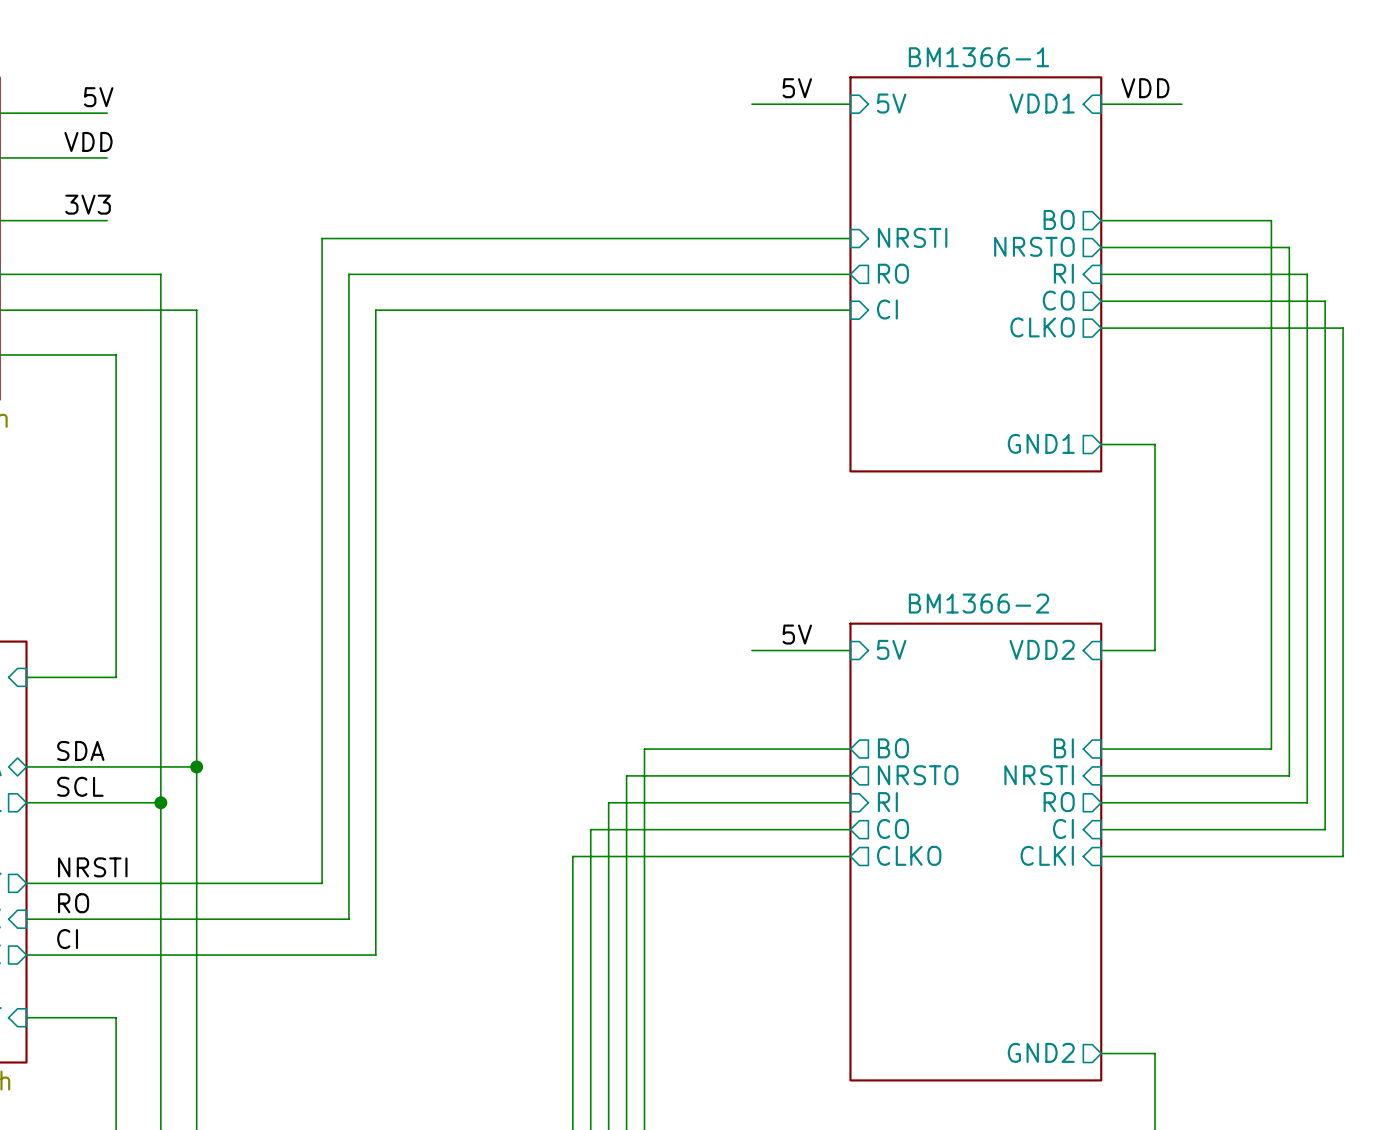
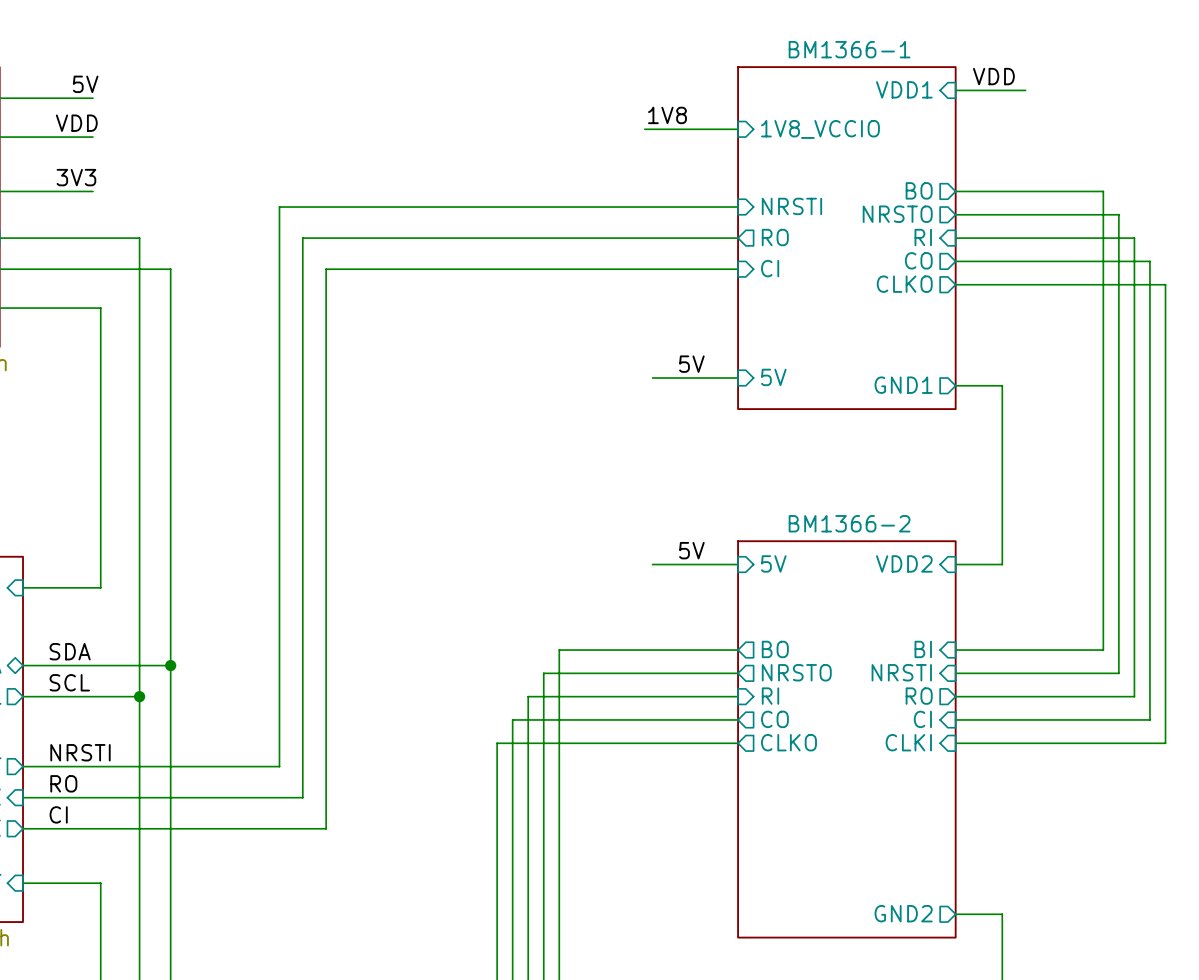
label position: 5V (797, 88) -> 5V (691, 364)
sheet pin position: 5V (891, 103) -> 5V (773, 377)
wire: (751, 104) (850, 104) -> (652, 378) (738, 378)
label: none -> 1V8 (667, 115)
wire: none -> (644, 129) (738, 129)
sheet pin: none -> 1V8_VCCIO (820, 129)

